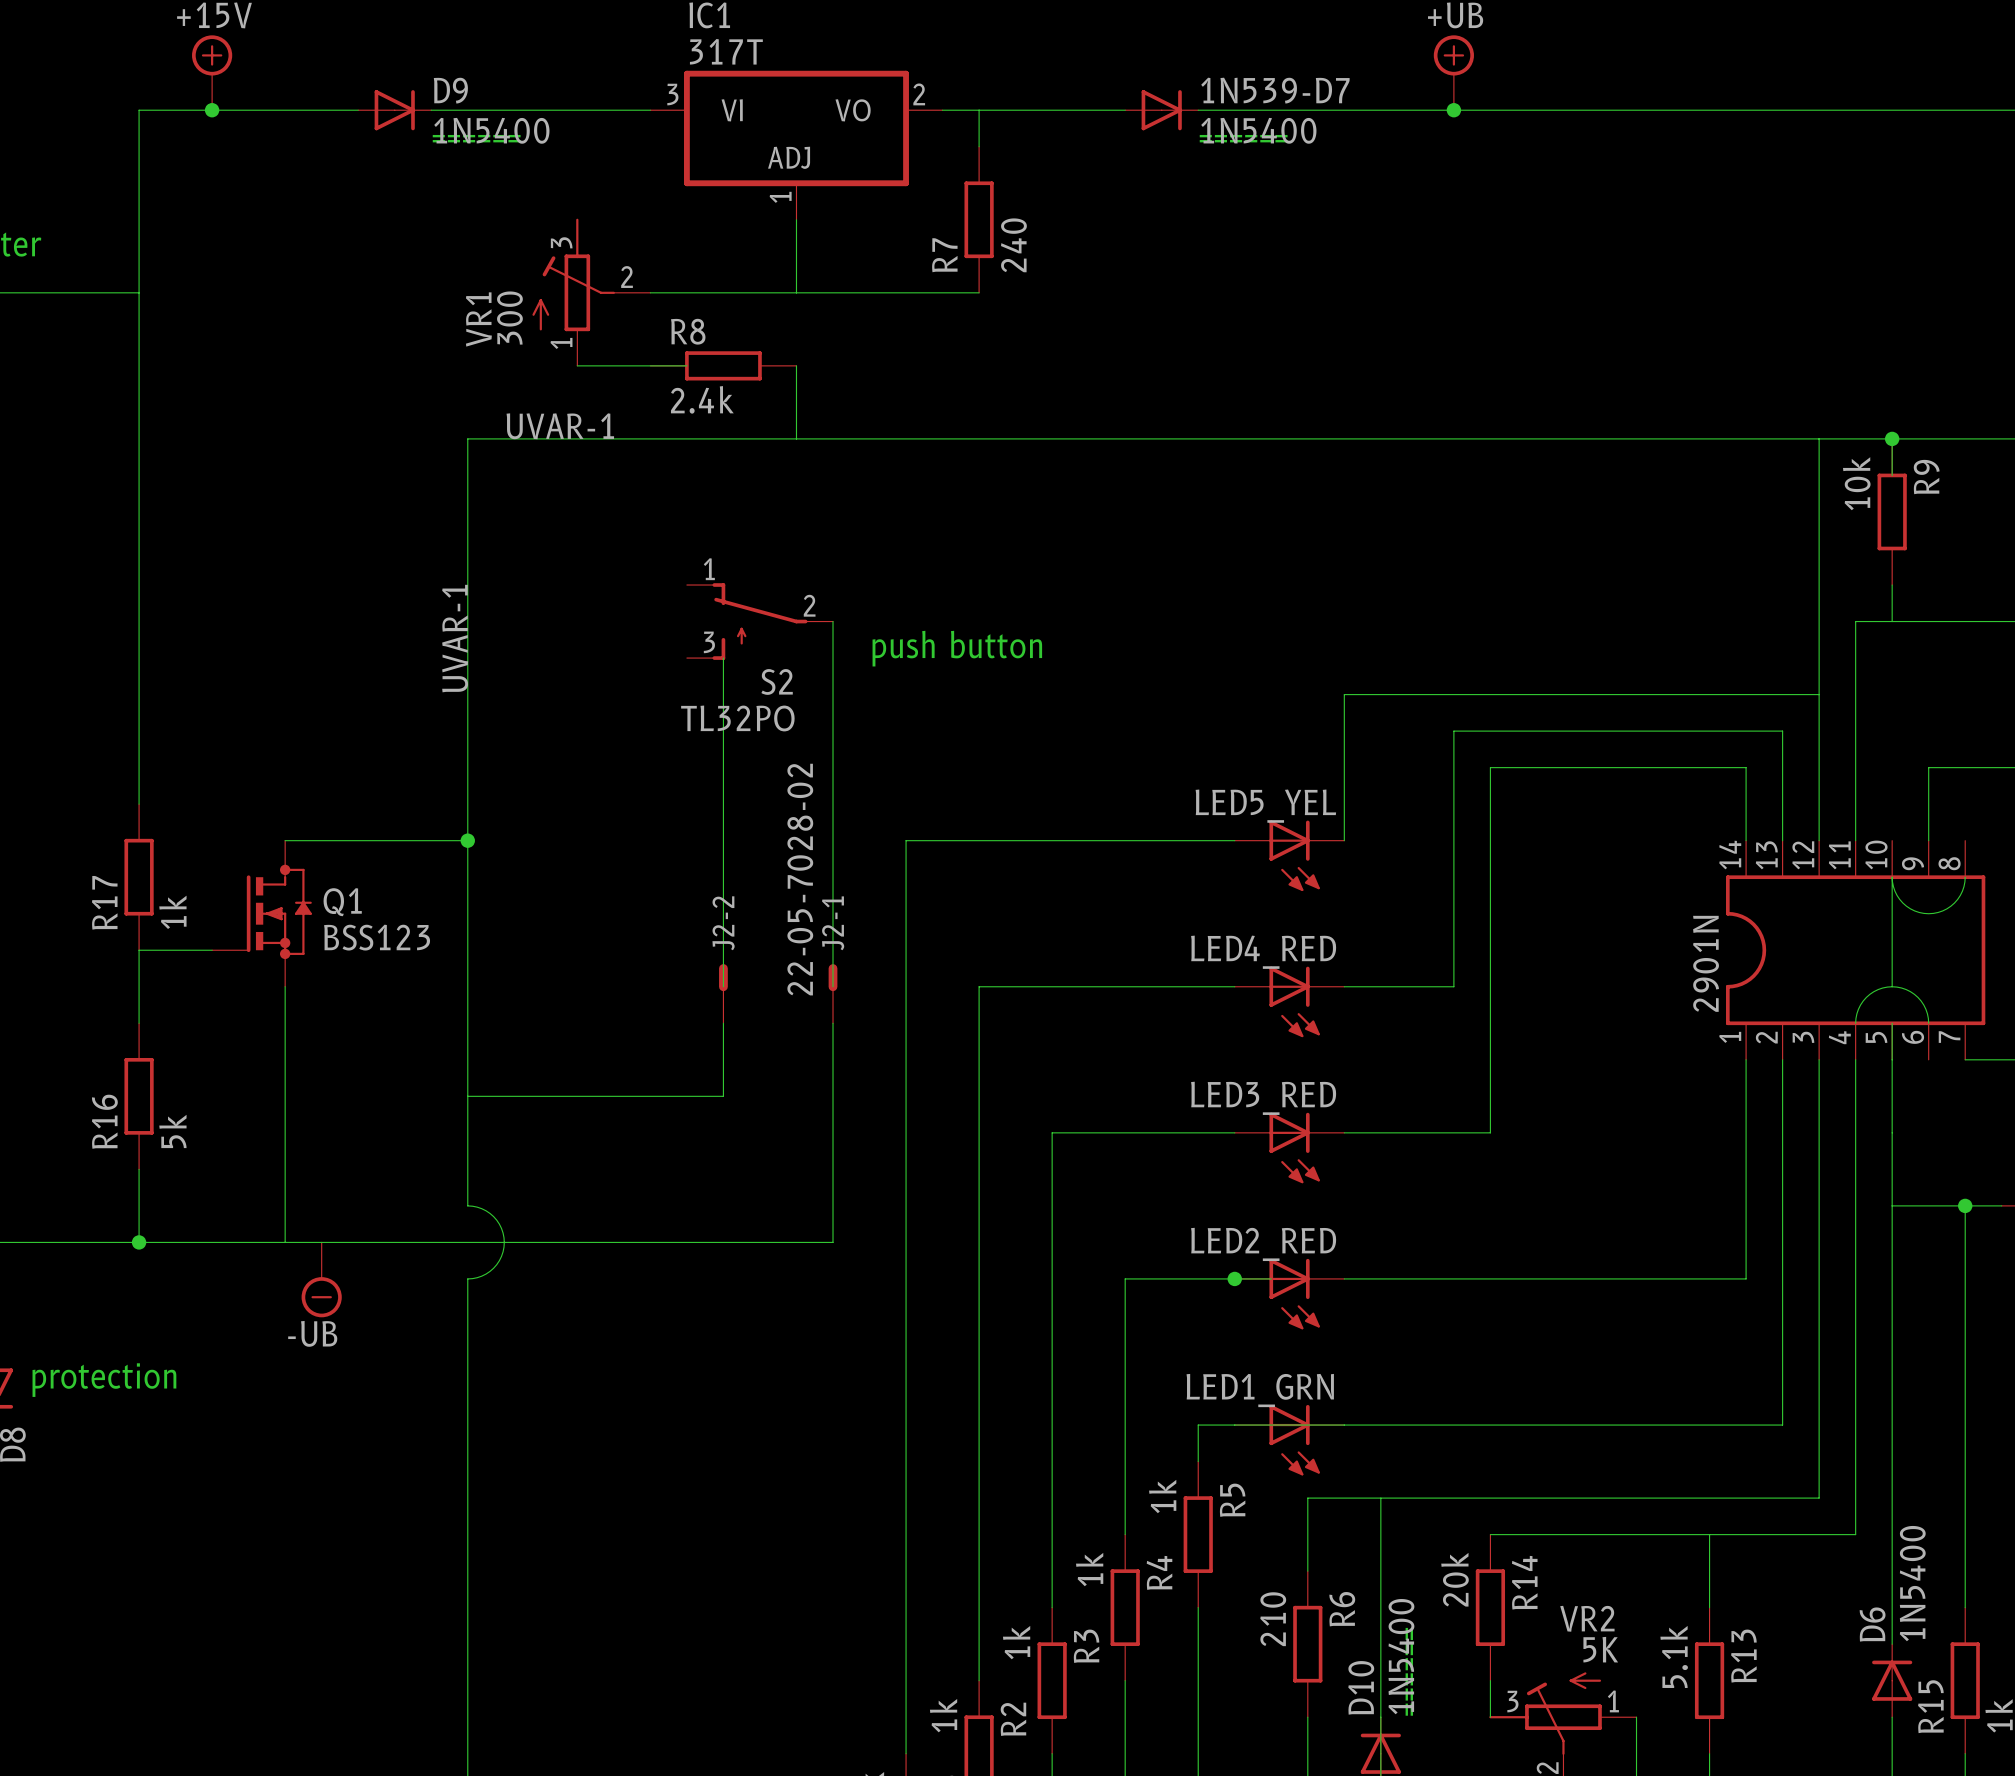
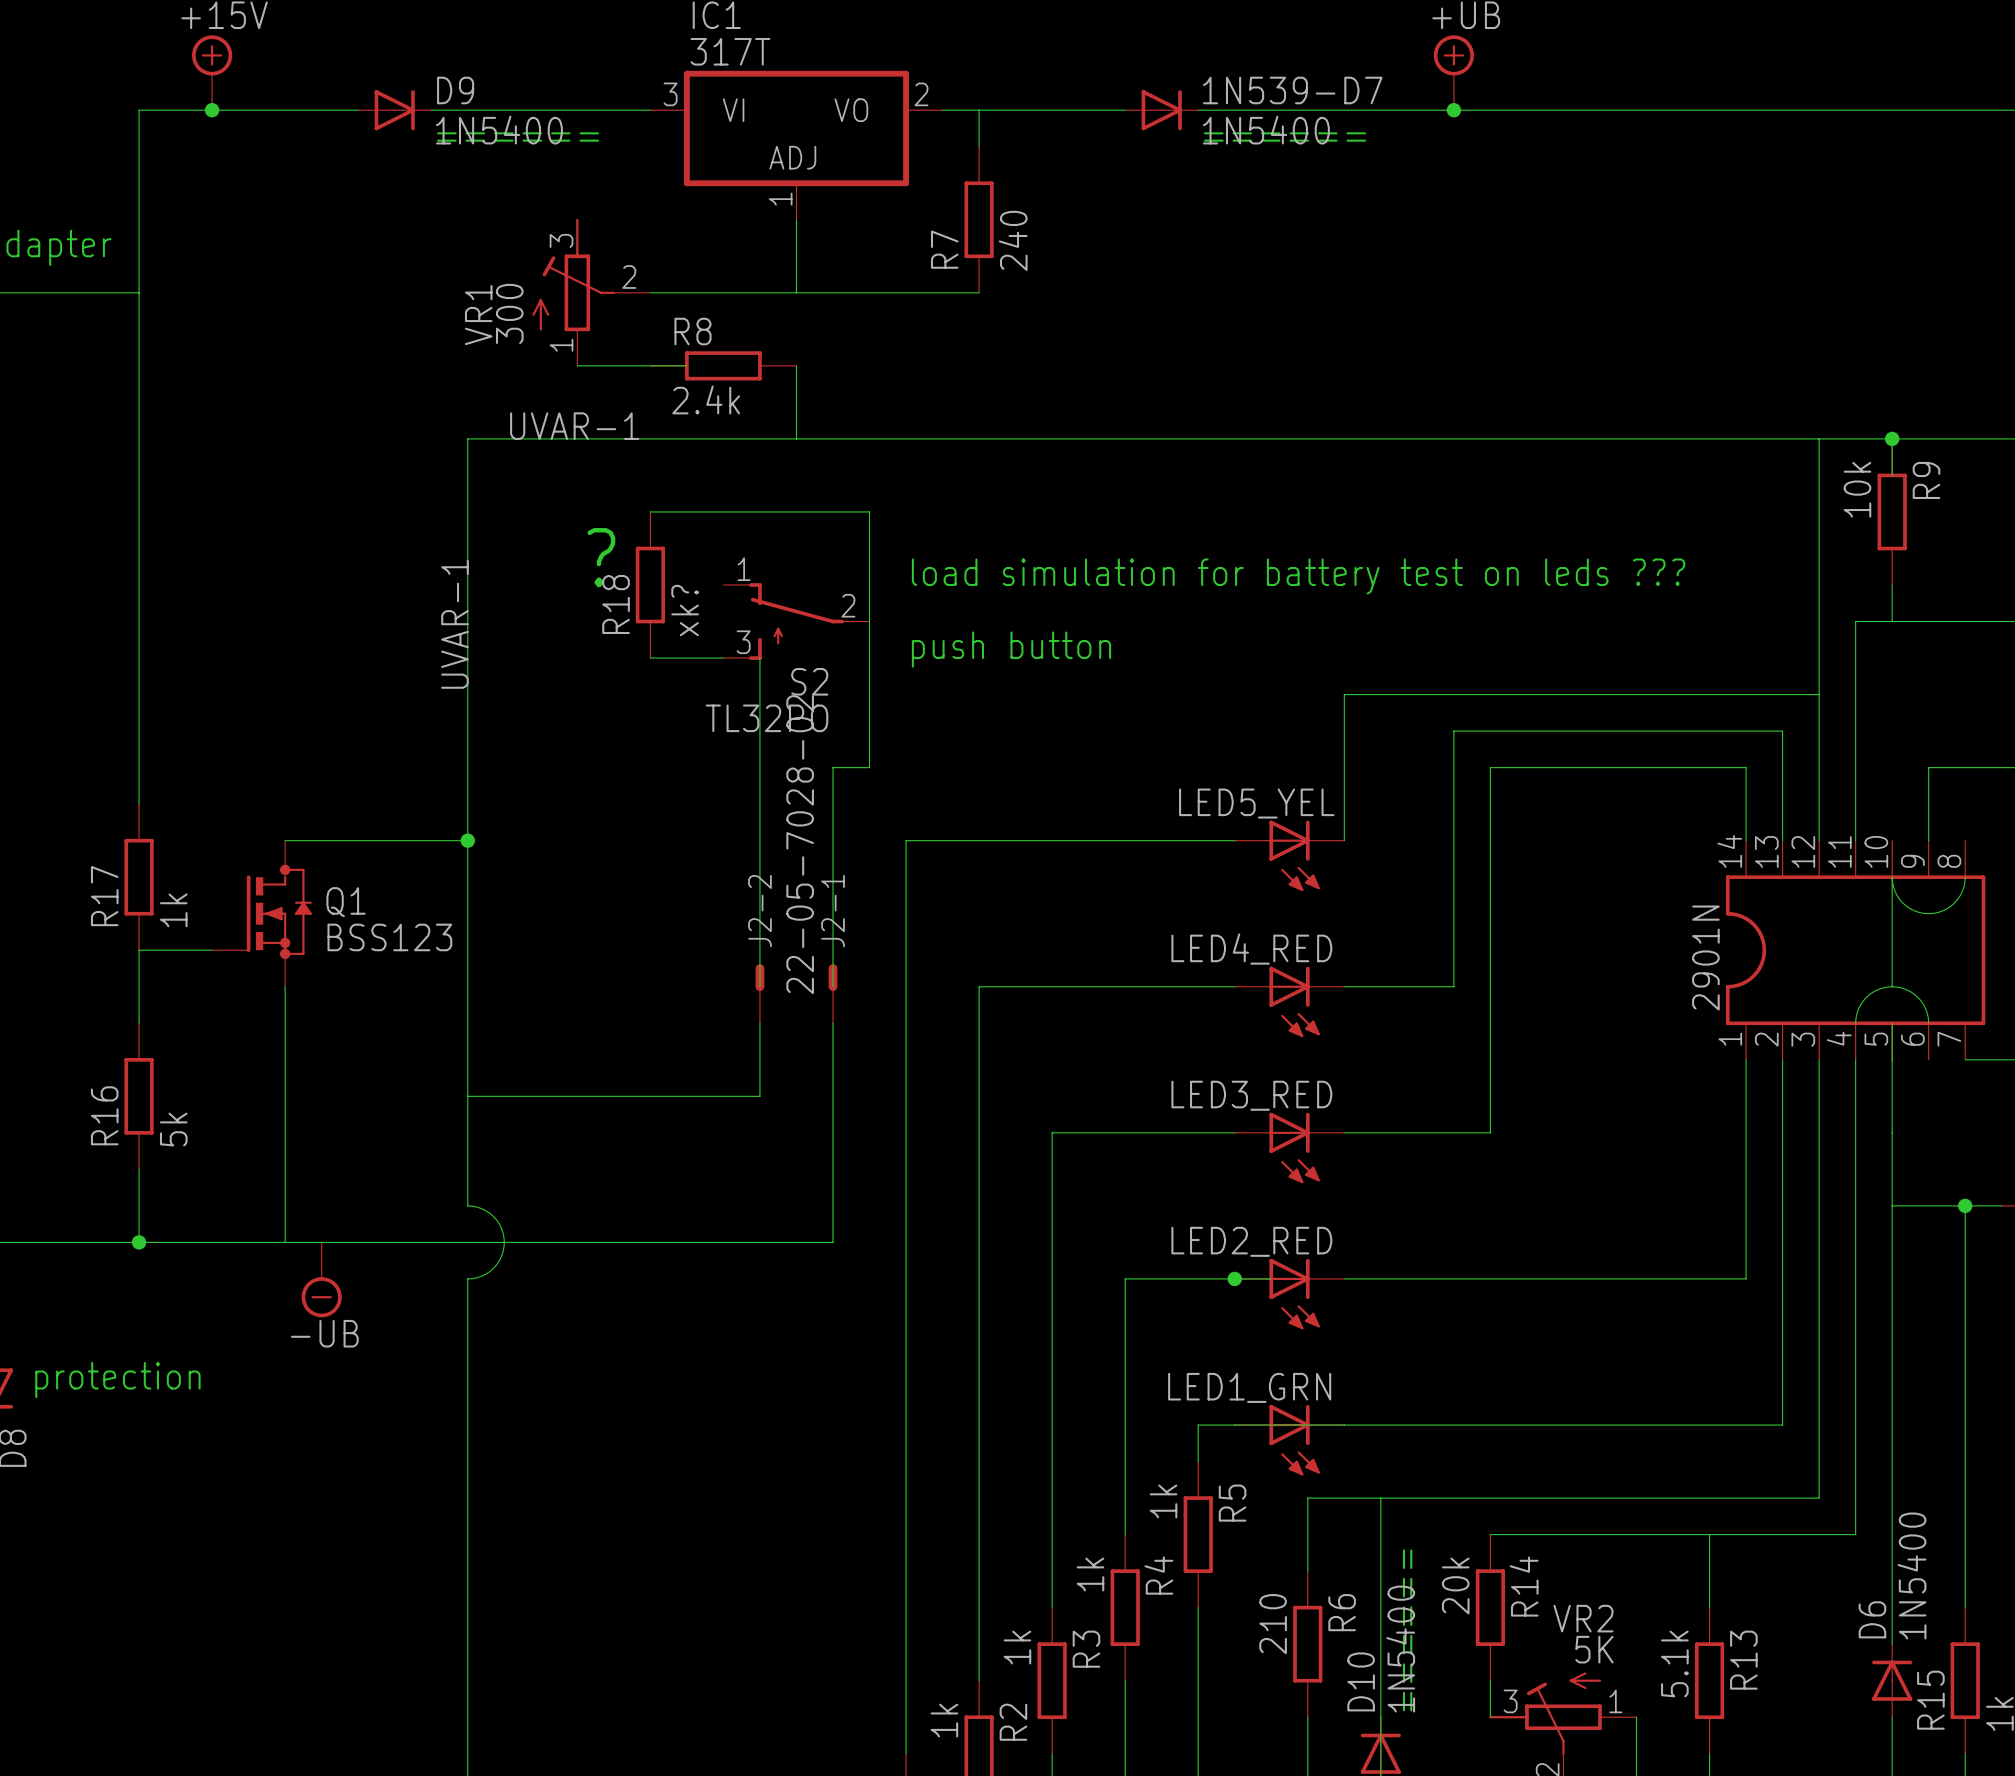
text: none -> ? (601, 557)
text: none -> load simulation for battery test on leds ??? (1298, 576)
R18: none -> xk? (650, 585)
S2 position: (759, 621) -> (796, 621)
wire: (833, 621) (833, 767) -> (650, 511) (869, 511) (869, 767) (833, 767)
text position: push button (957, 648) -> push button (1011, 649)
wire: (723, 658) (723, 986) -> (723, 658) (650, 658)
wire: none -> (759, 658) (759, 986)
J2-2 position: (723, 993) -> (759, 993)
wire: (723, 1023) (723, 1096) -> (759, 1023) (759, 1096) (723, 1096)

